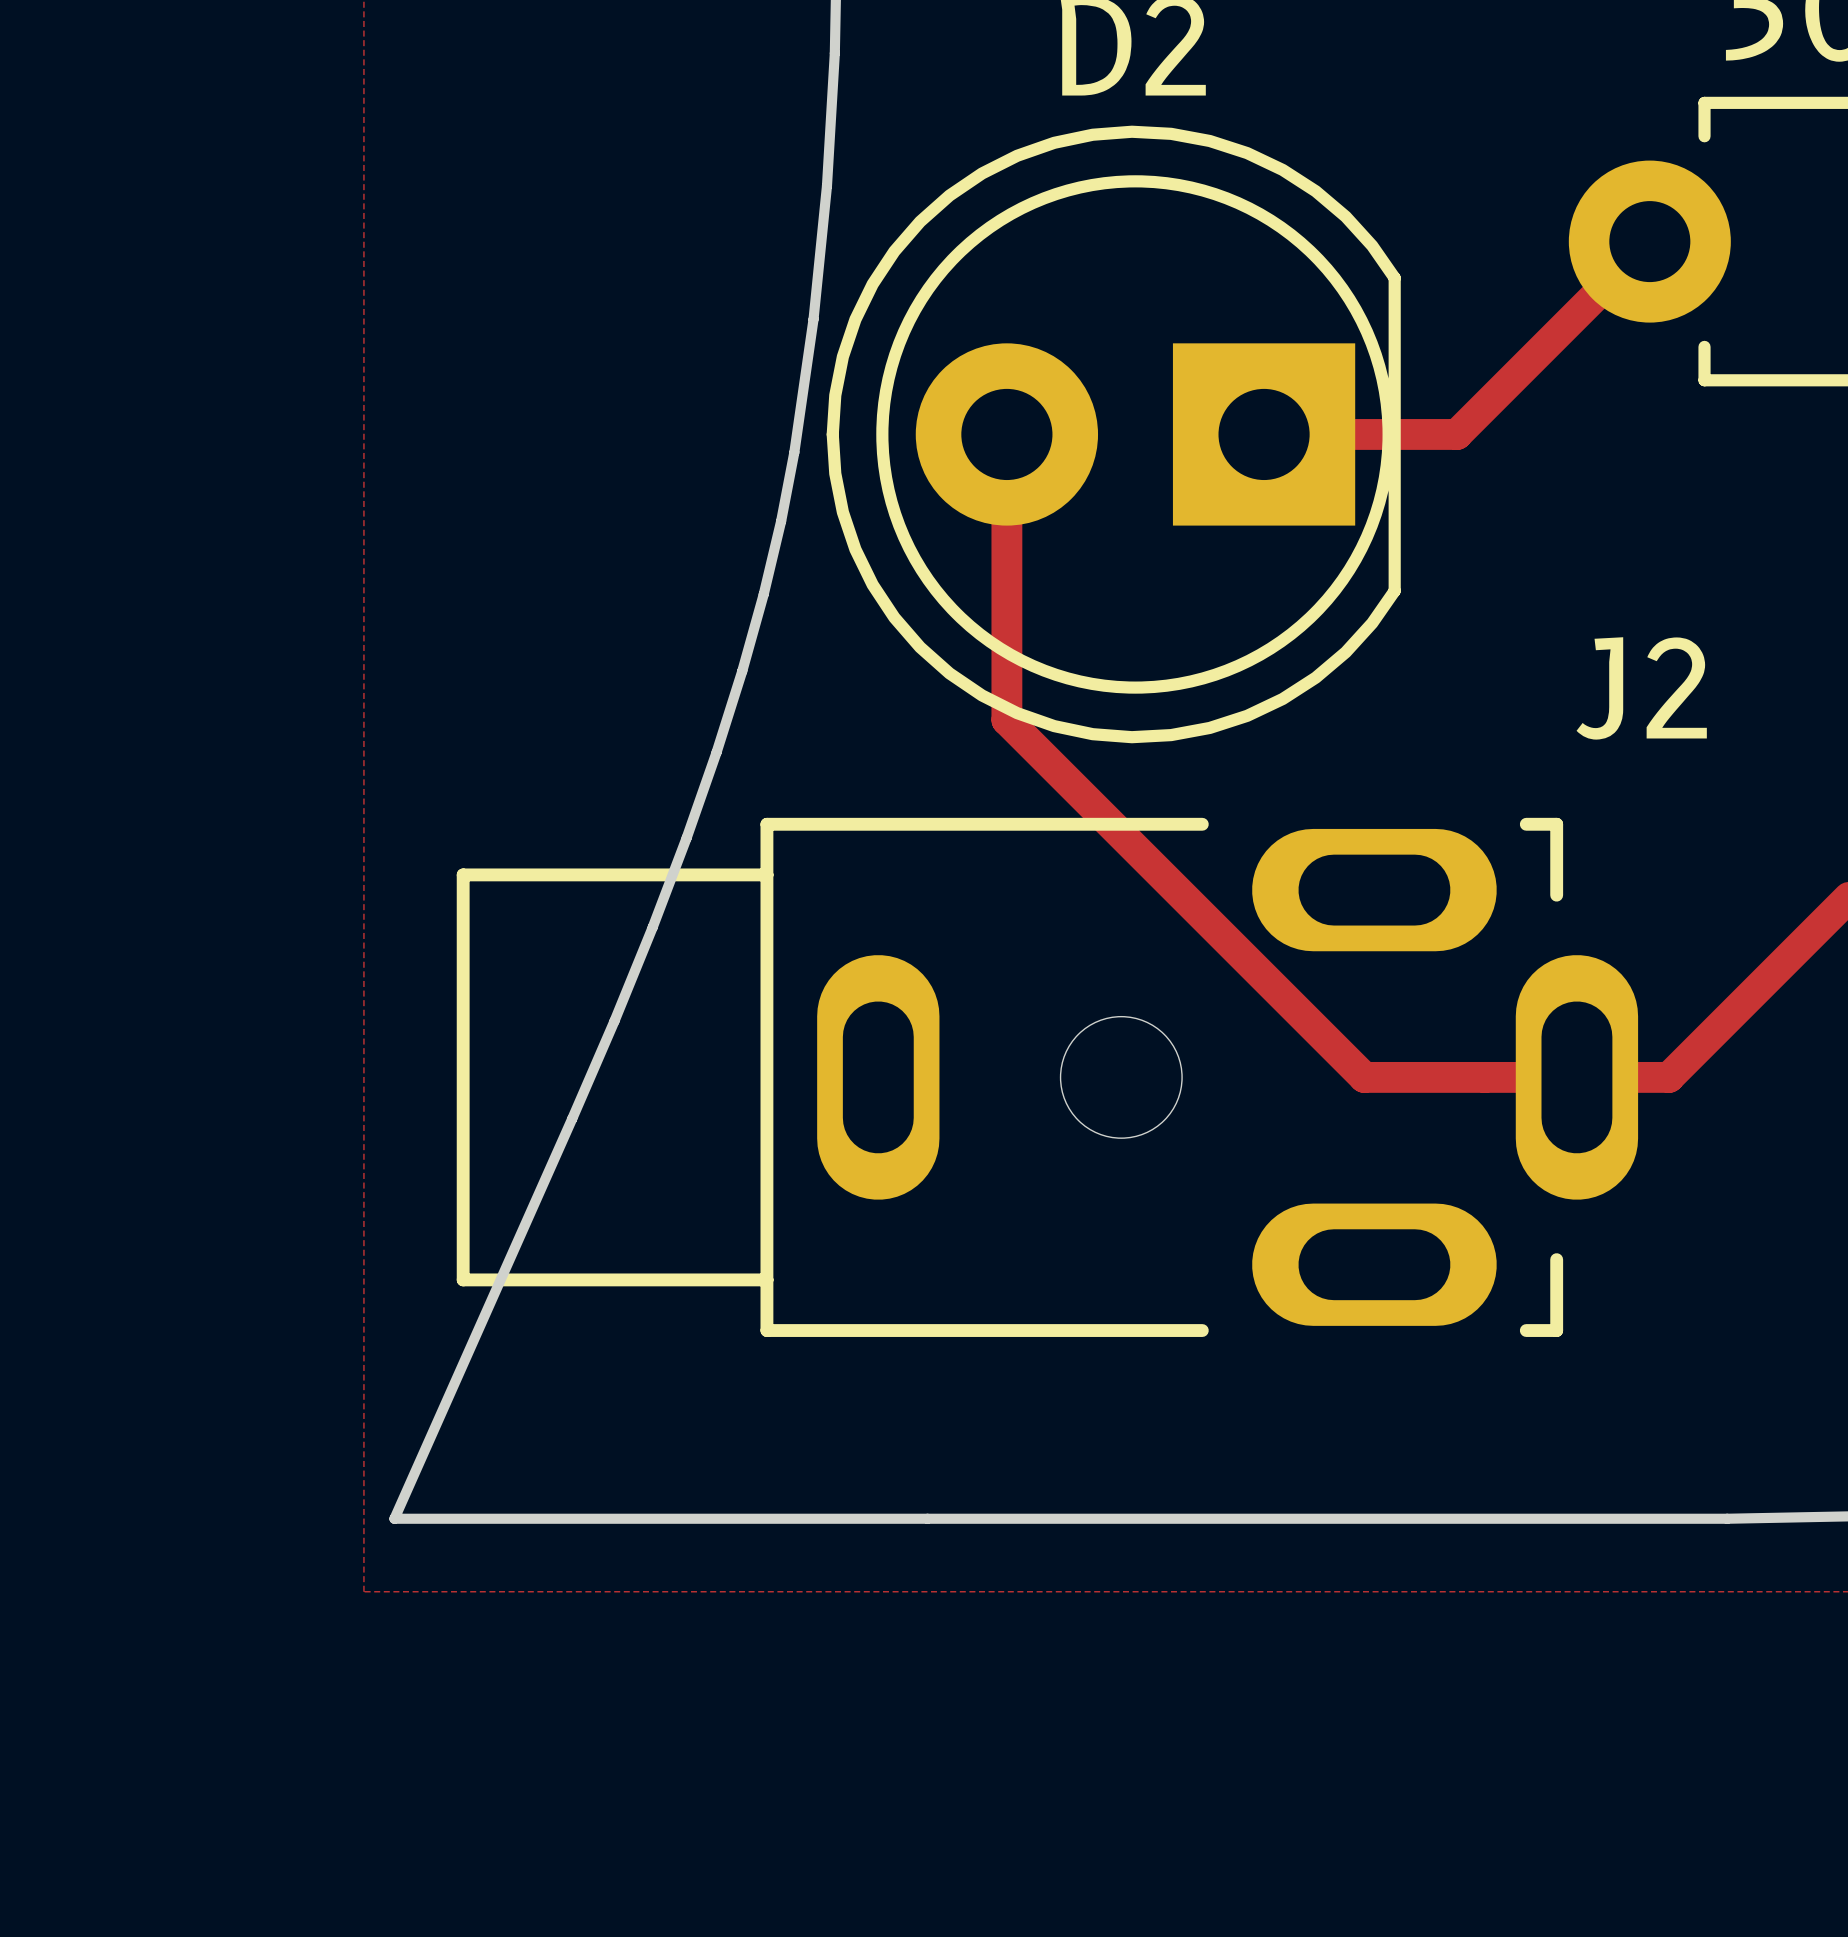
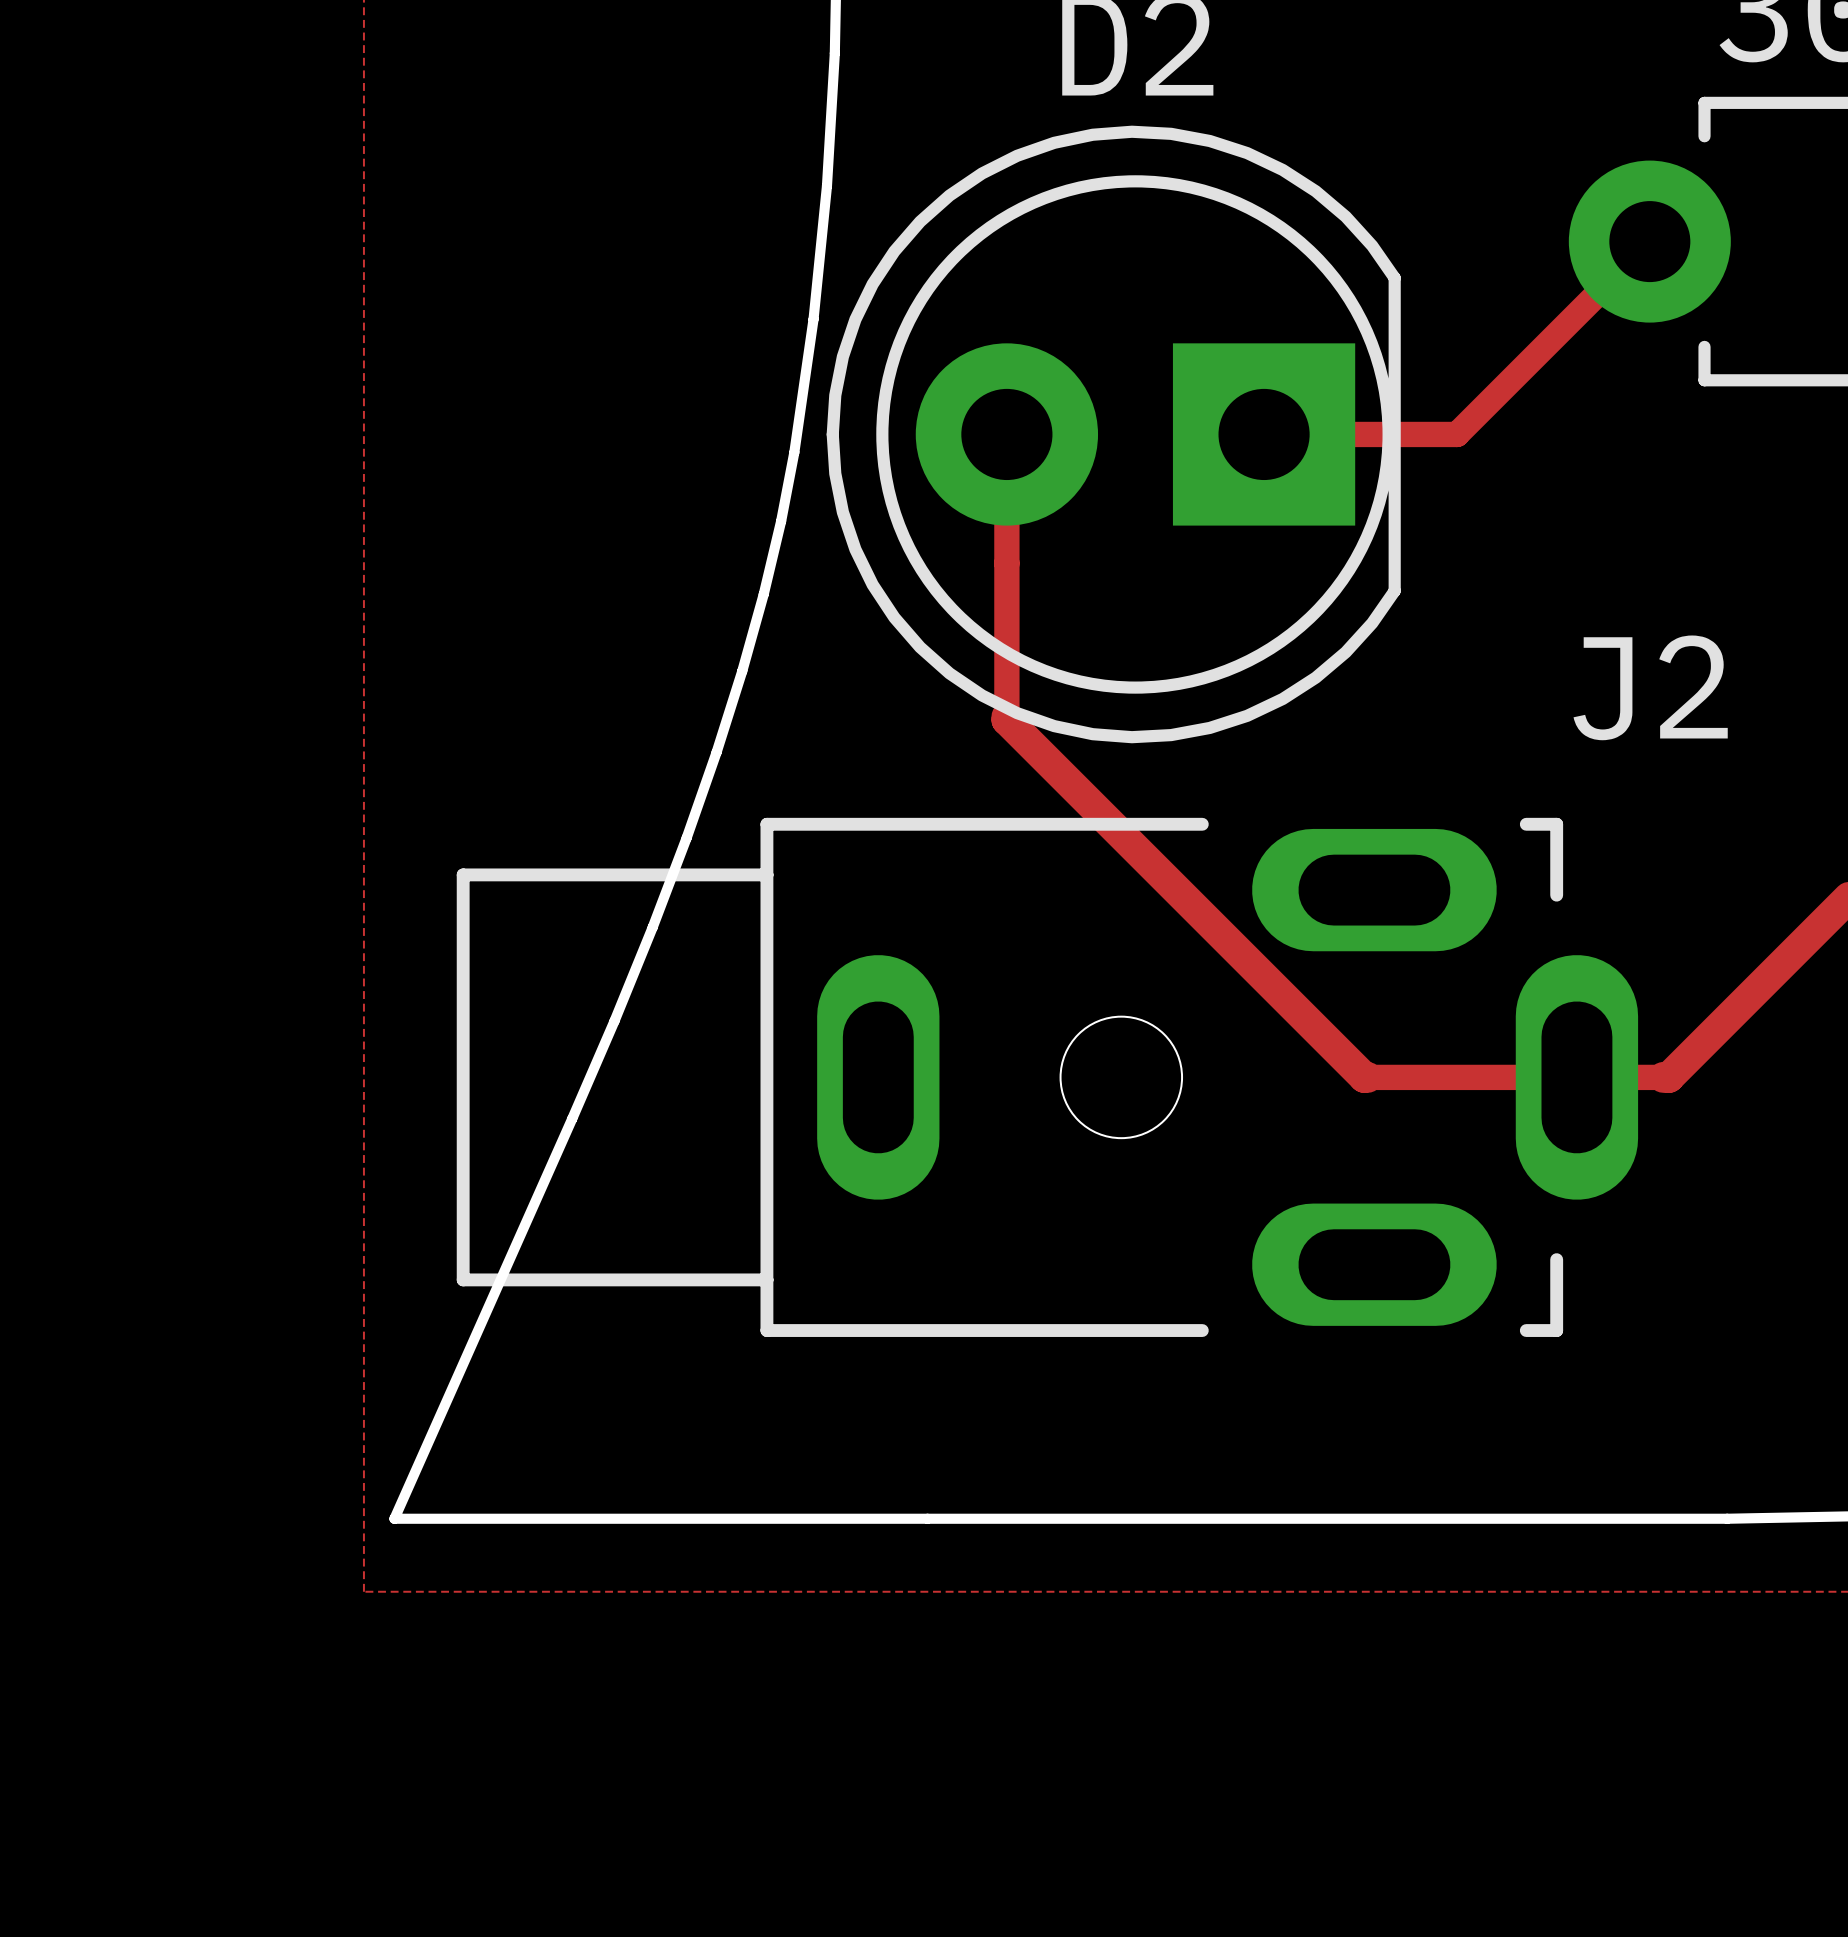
track width: thick (1649, 241) (1456, 434) (1264, 434) -> thin (1649, 241) (1456, 434) (1264, 434)
track width: thick (1006, 434) (1006, 716) -> thin (1006, 434) (1006, 716)
track width: thick (1367, 1077) (1663, 1077) -> thin (1367, 1077) (1663, 1077)

